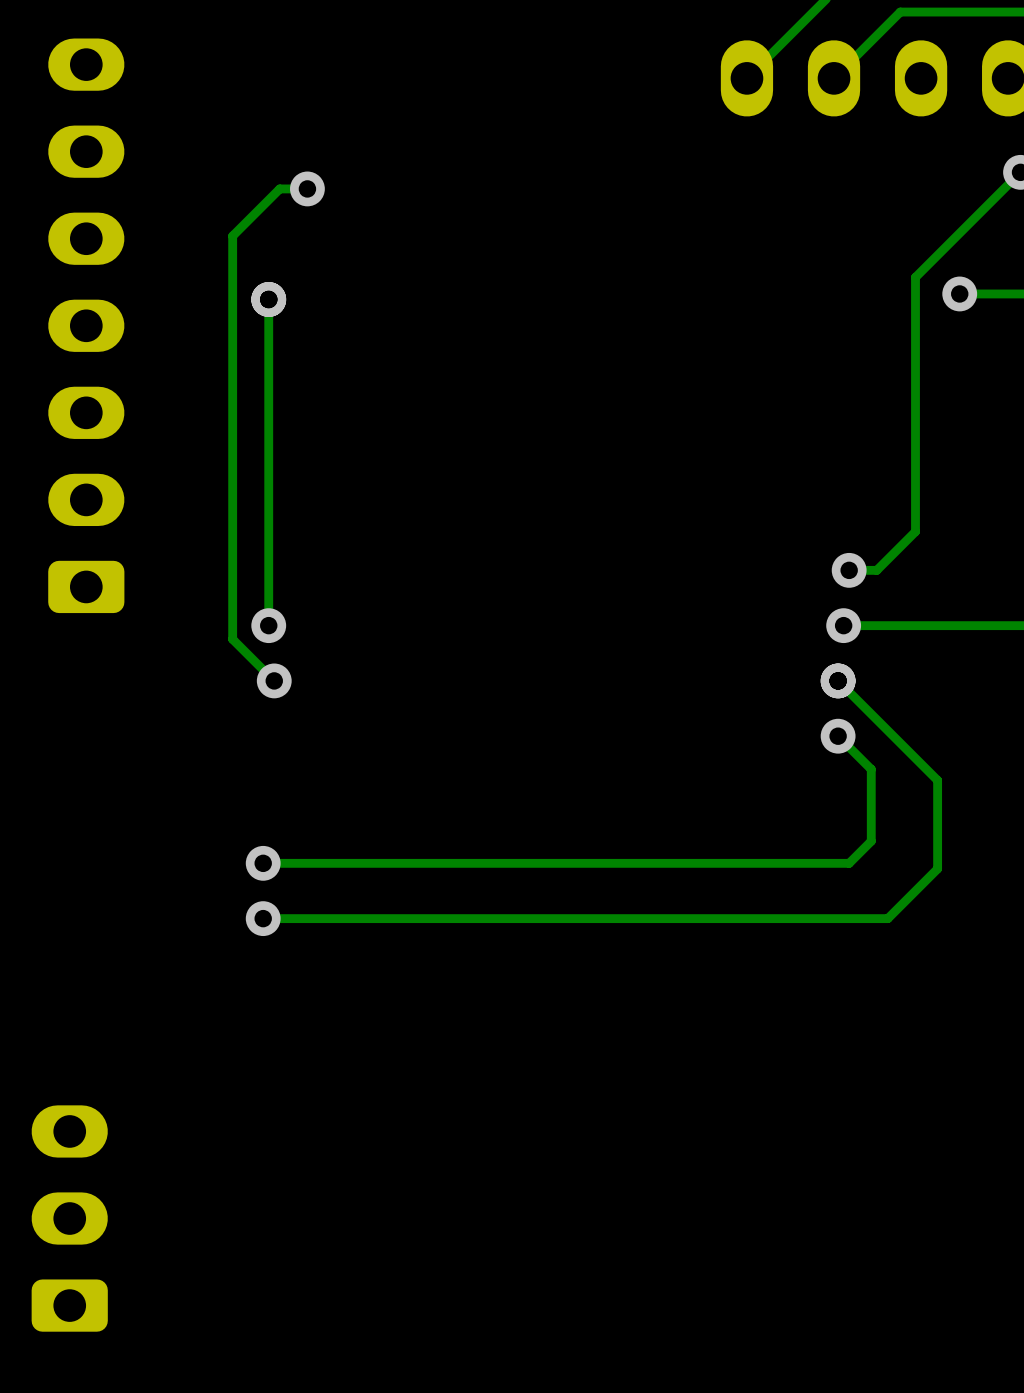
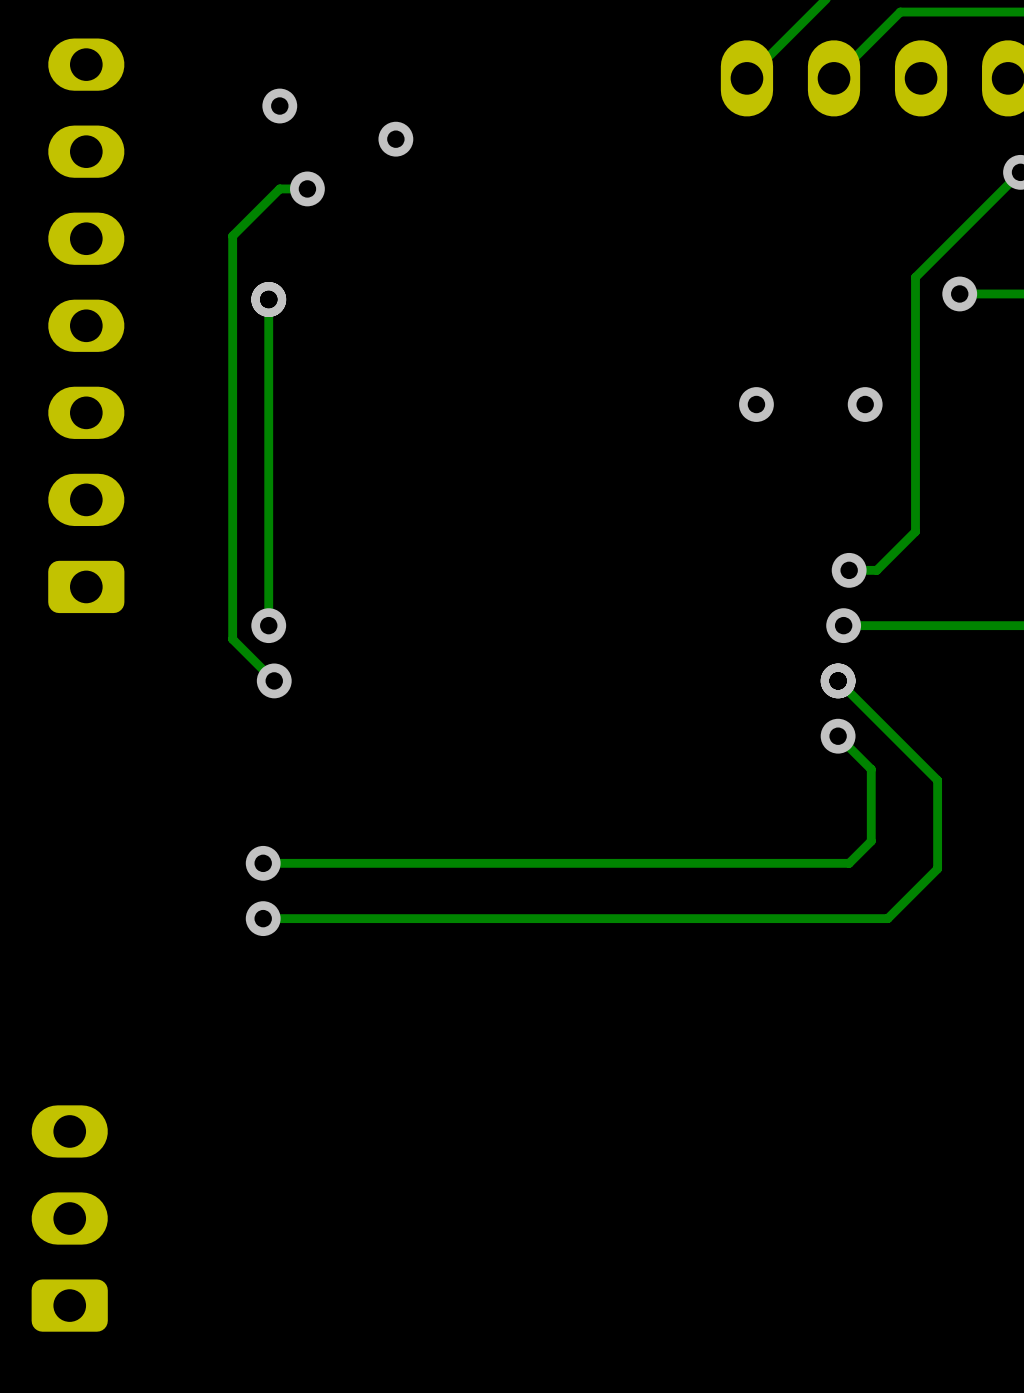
via: none -> (279, 106)
via: none -> (395, 139)
via: none -> (756, 404)
via: none -> (865, 404)

